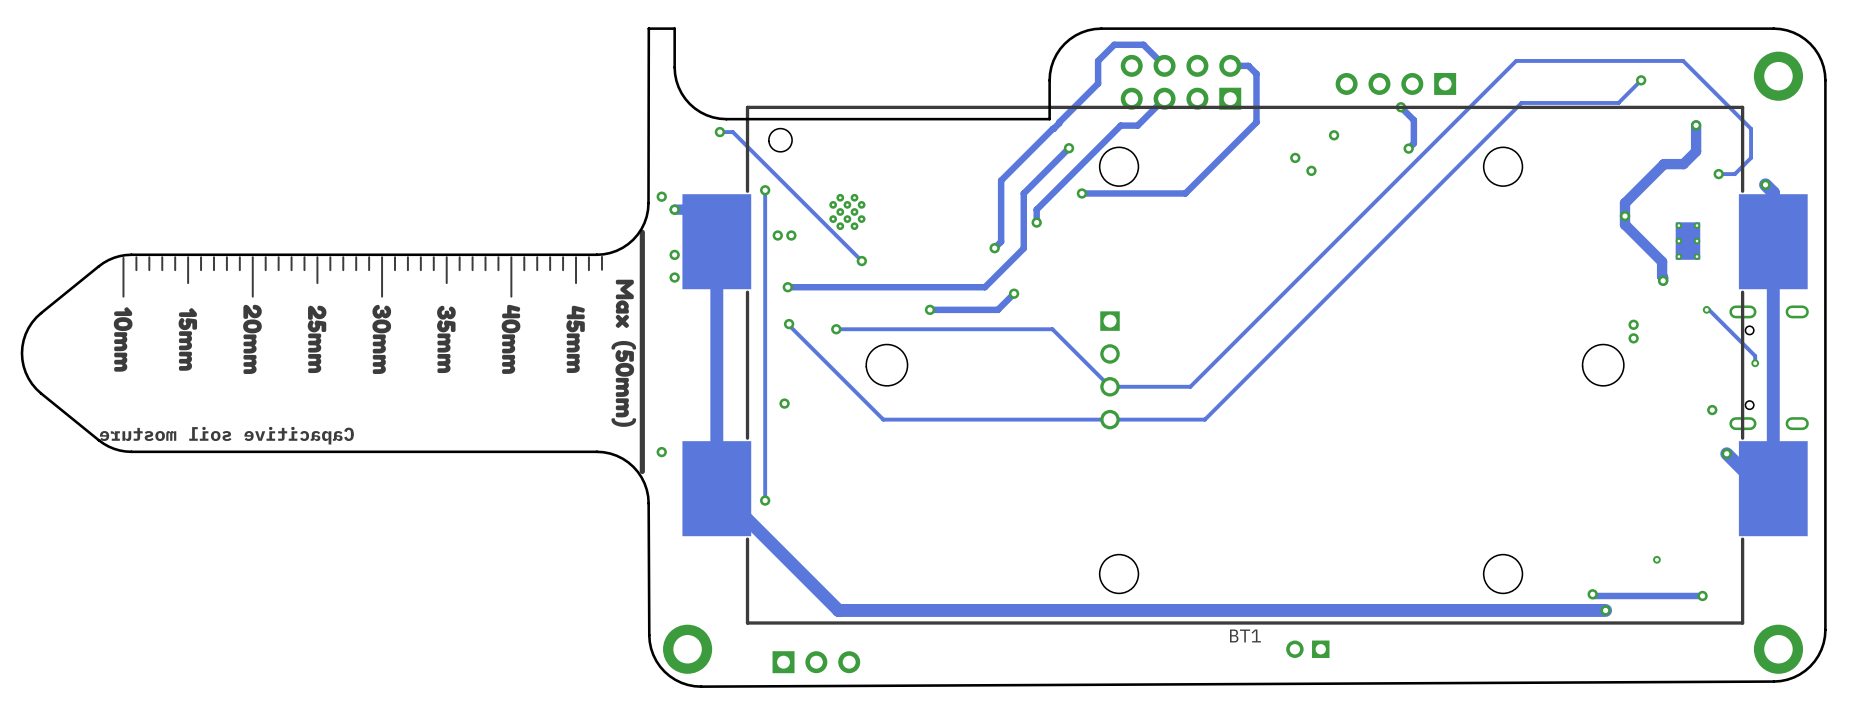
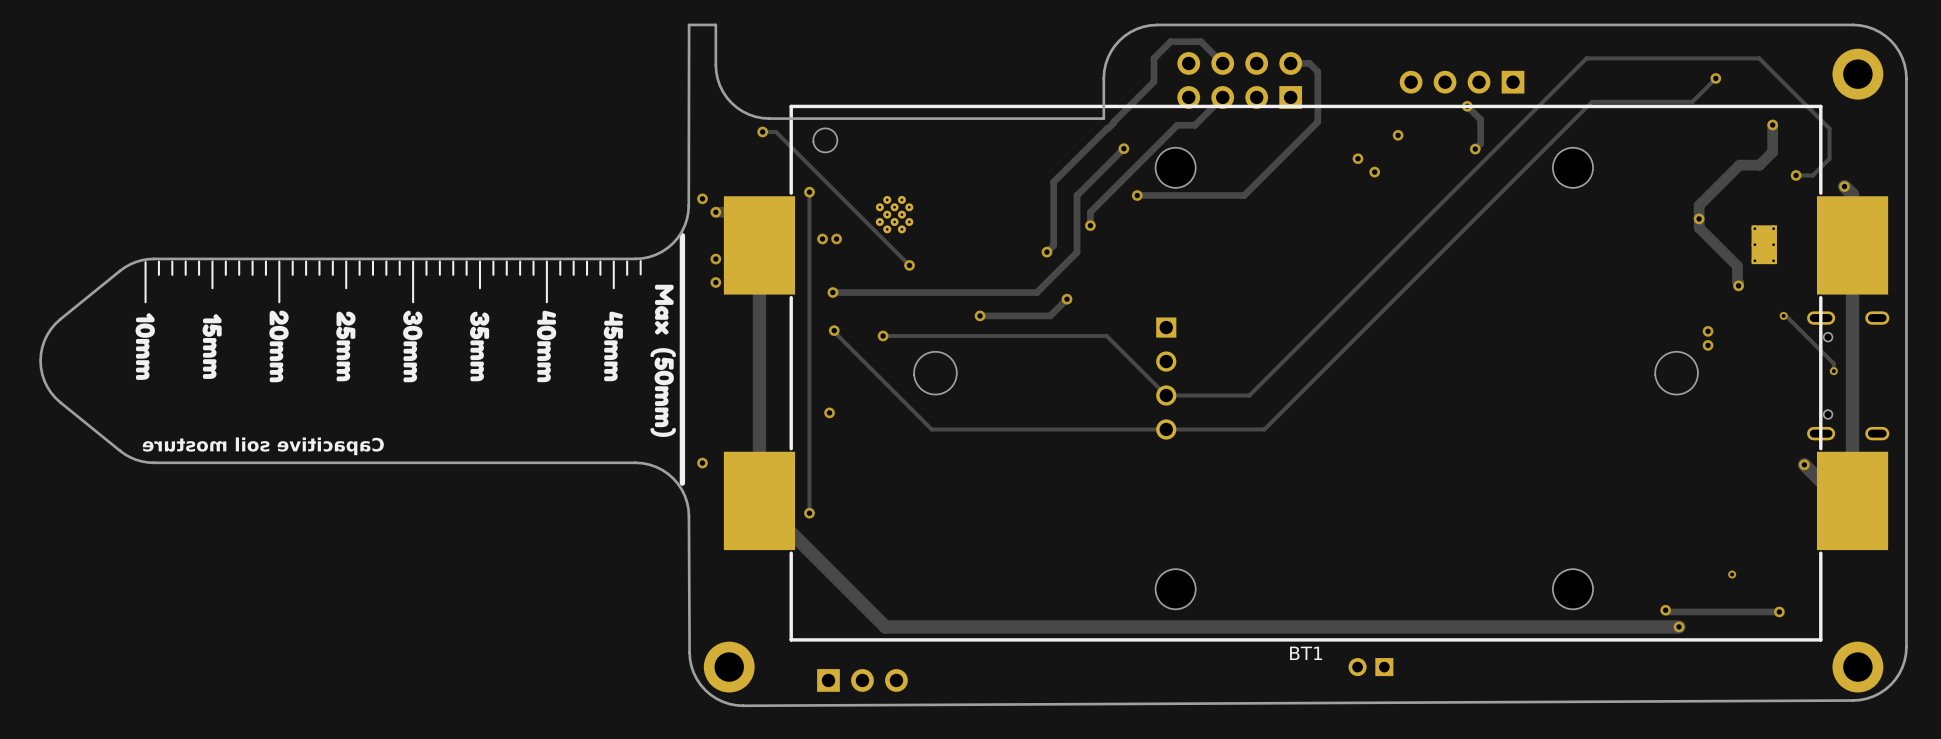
via: (1712, 410) -> none

